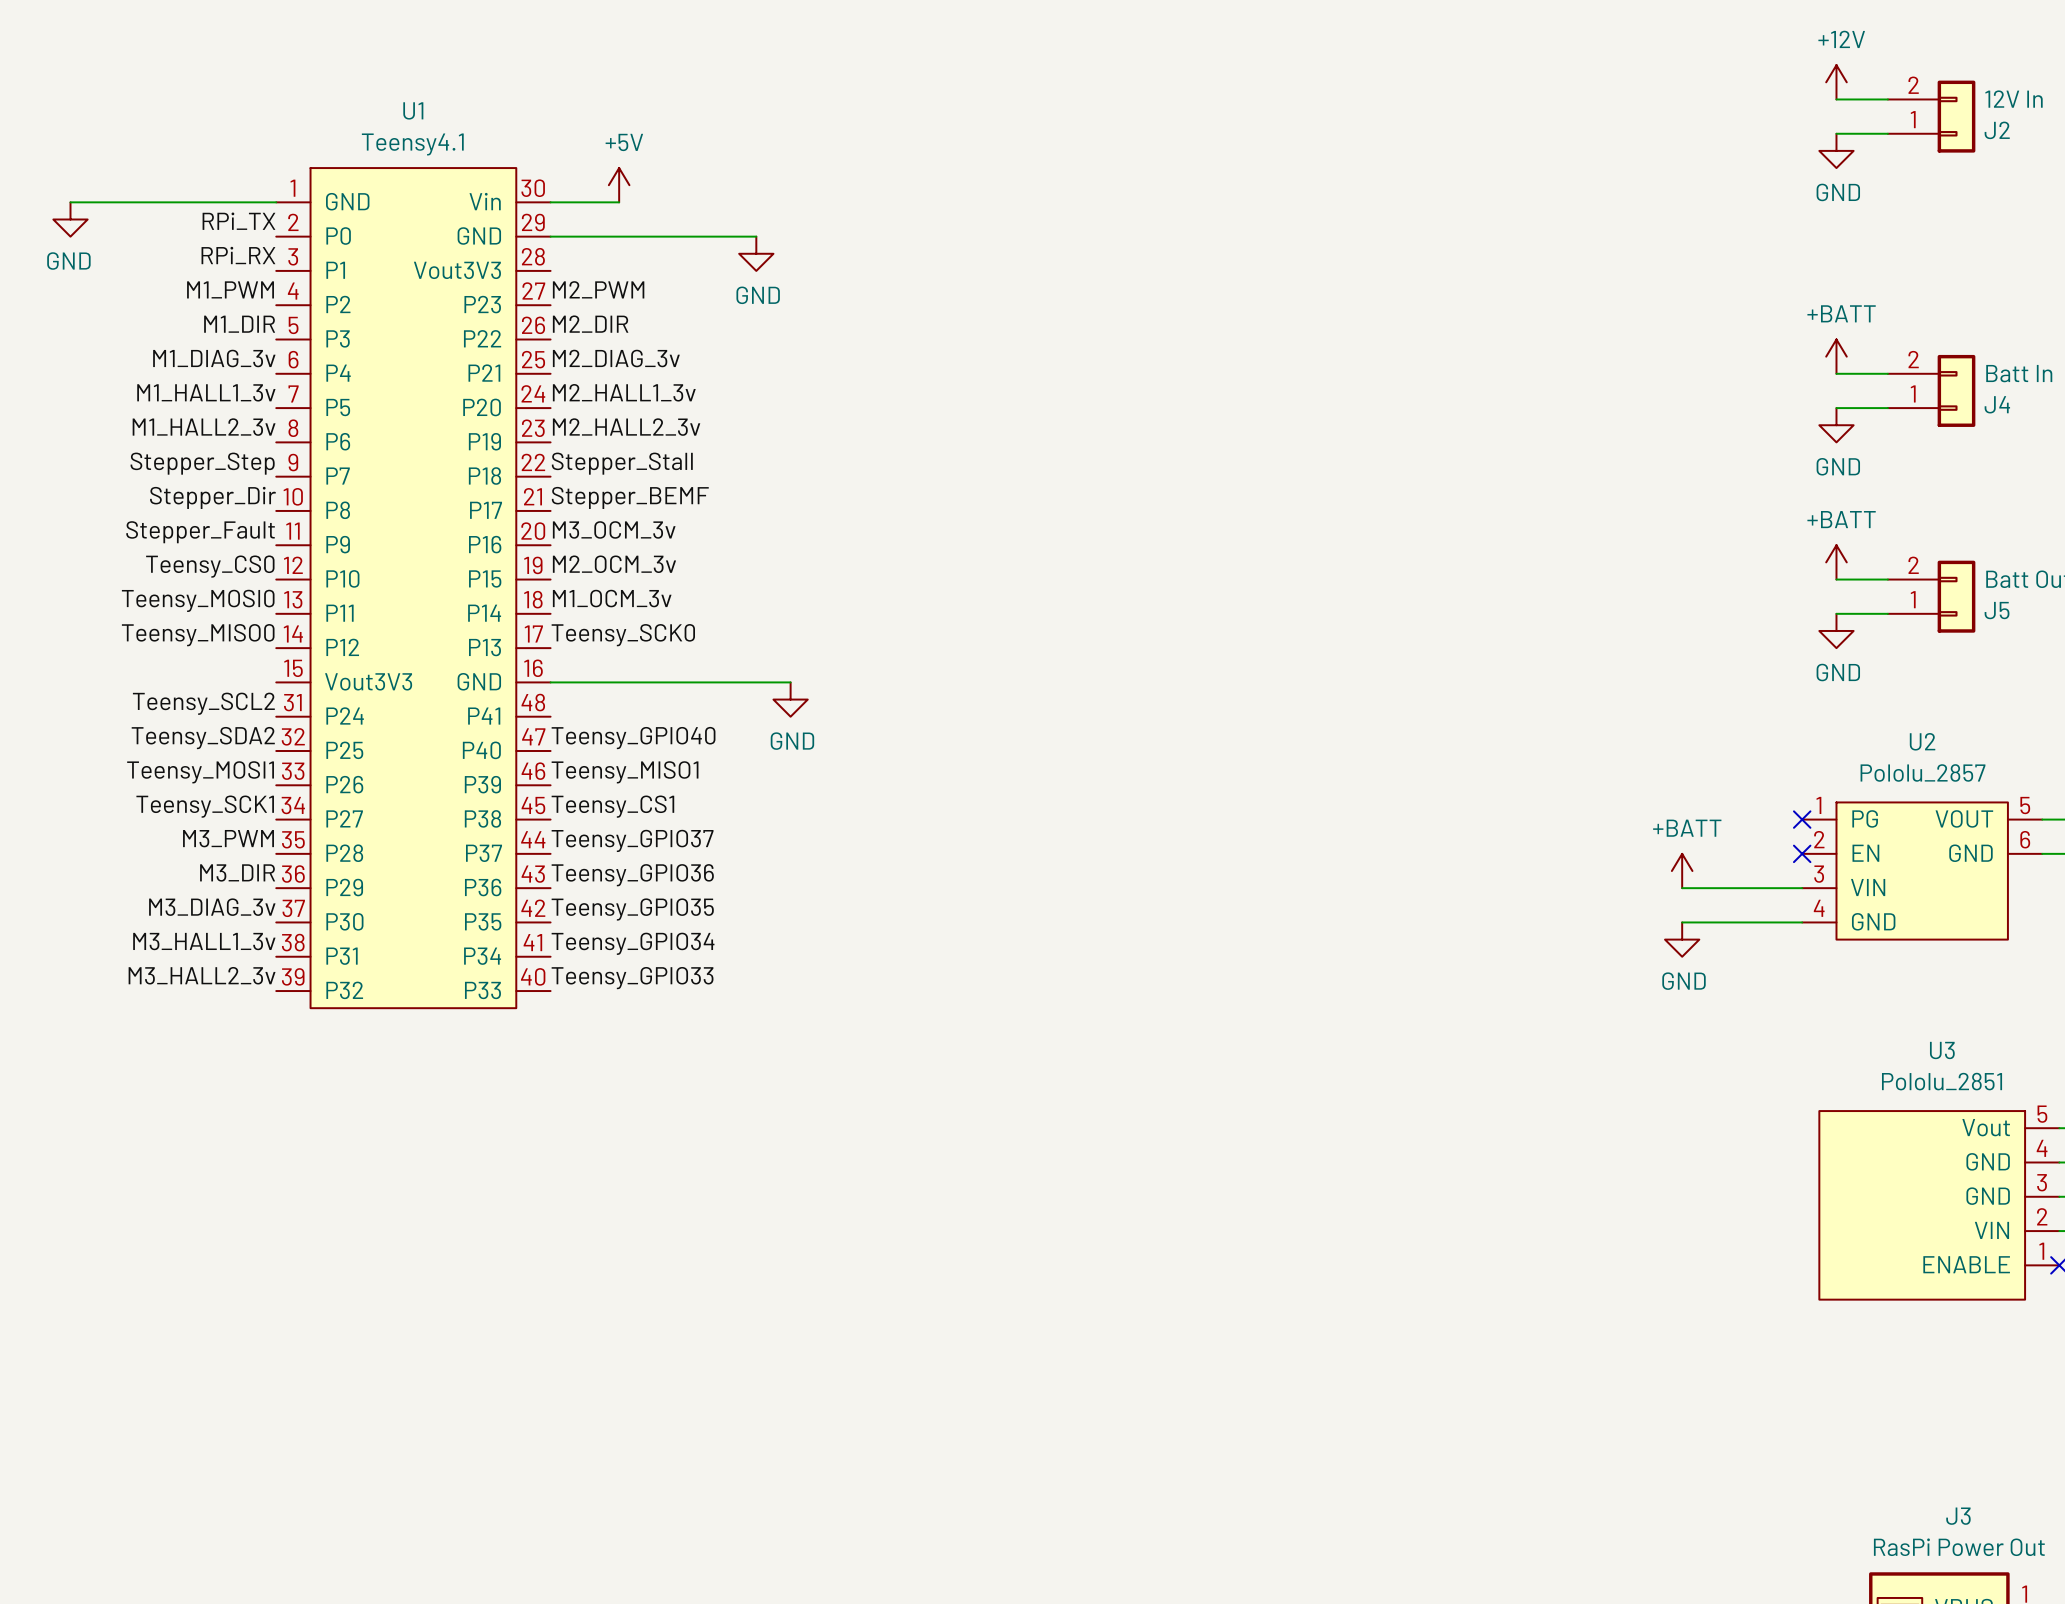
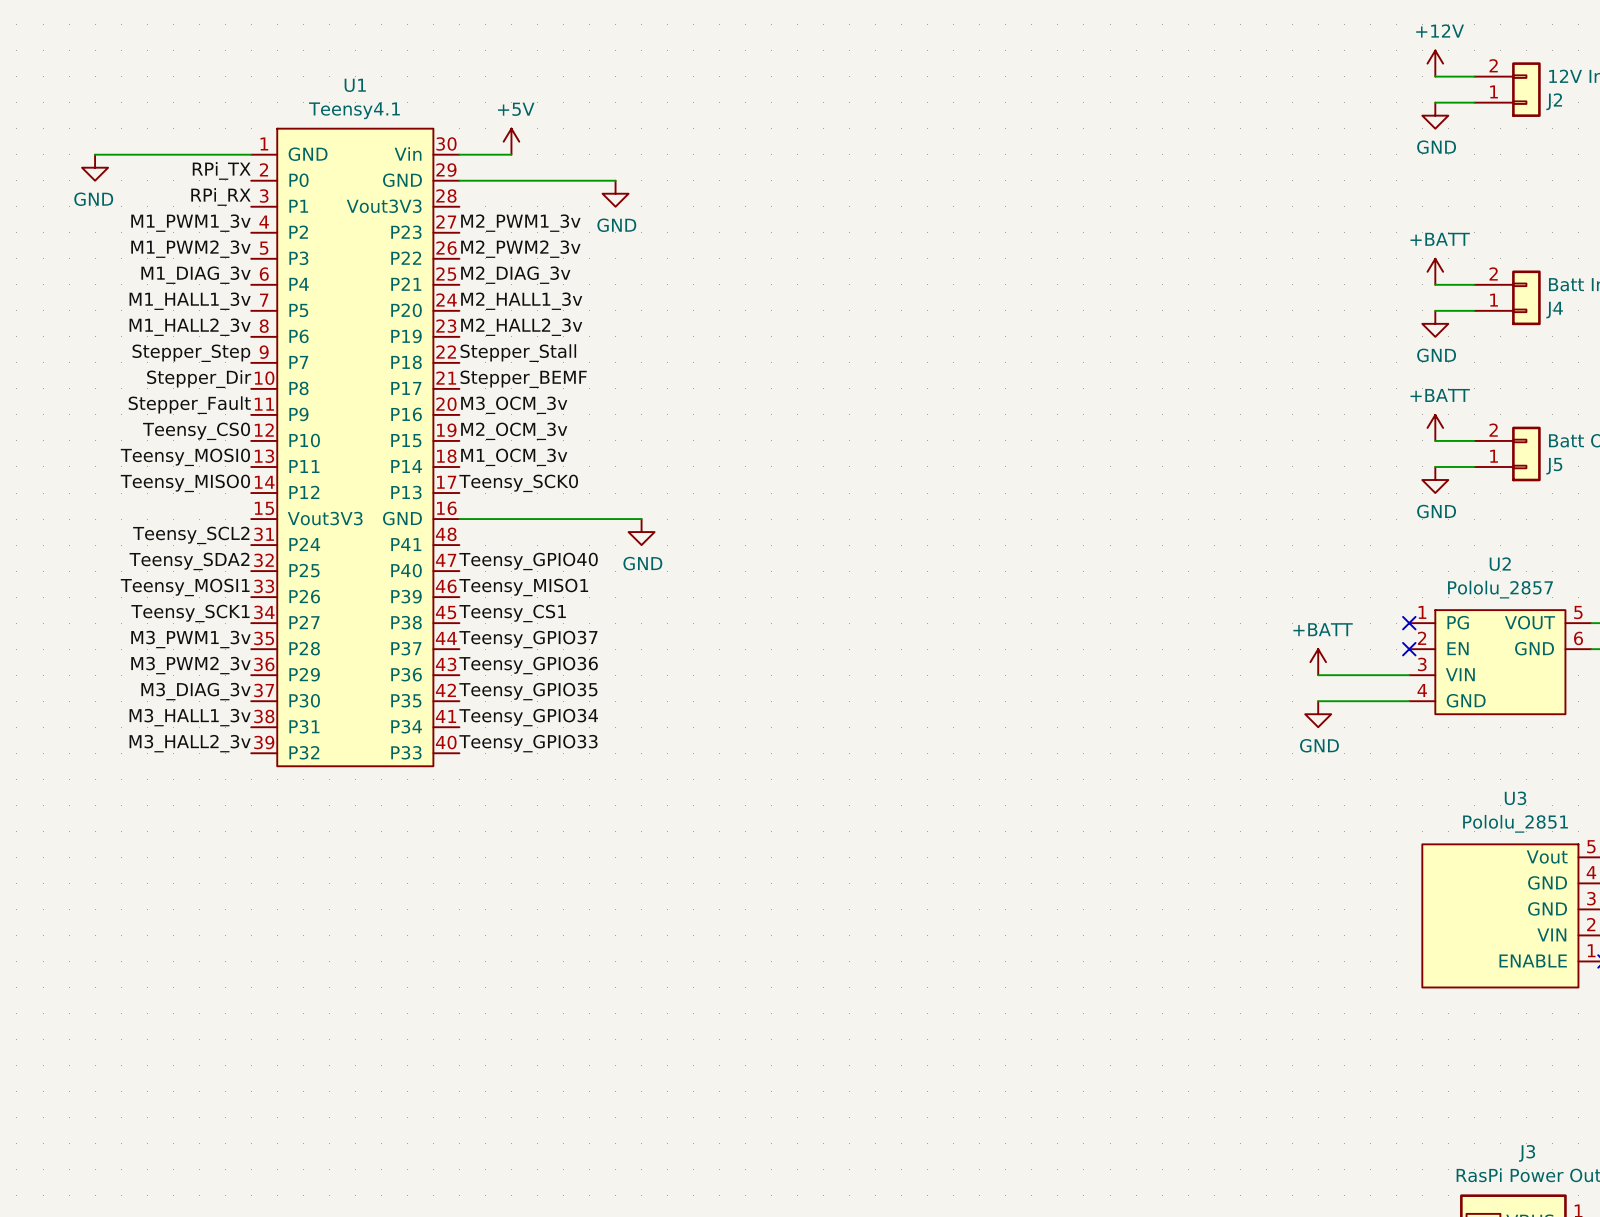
label: M1_PWM (230, 289) -> M1_PWM1_3v (190, 223)
label: M2_PWM (598, 289) -> M2_PWM1_3v (520, 223)
label: M1_DIR (239, 324) -> M1_PWM2_3v (190, 249)
label: M2_DIR (590, 324) -> M2_PWM2_3v (520, 249)
label: M3_PWM (228, 838) -> M3_PWM1_3v (190, 639)
label: M3_DIR (237, 872) -> M3_PWM2_3v (190, 665)

